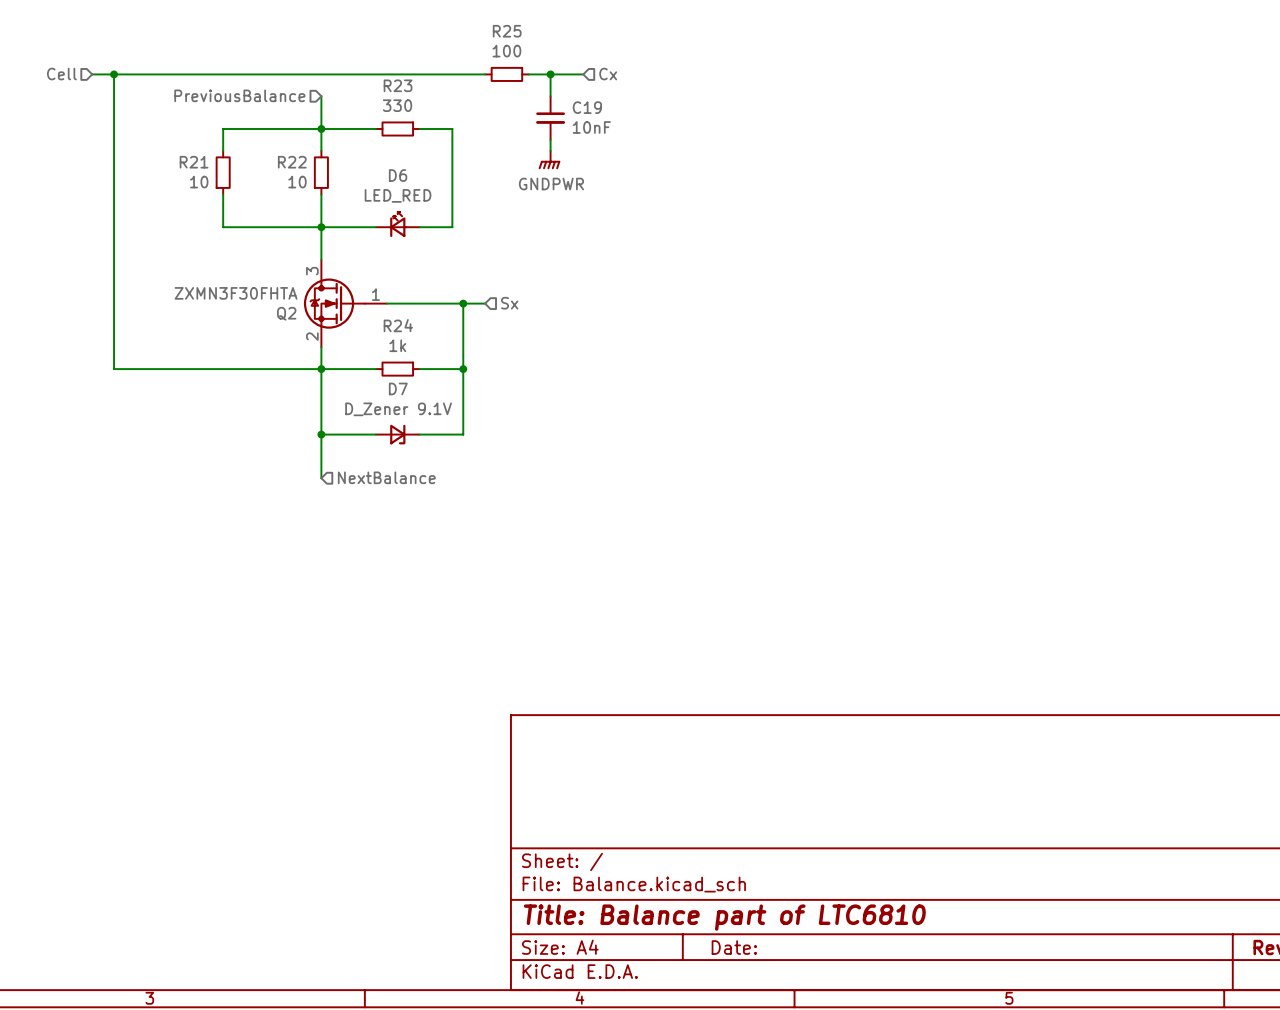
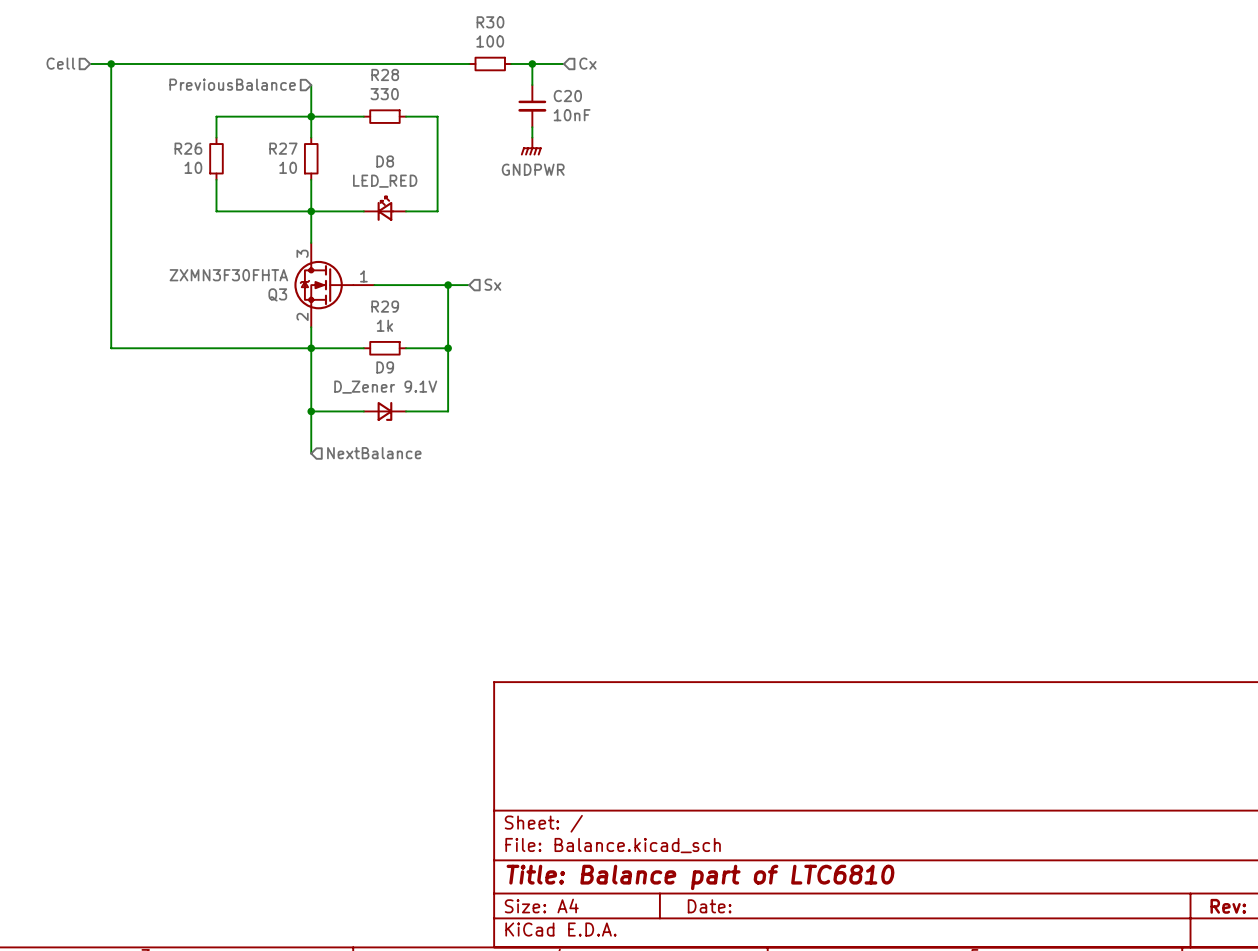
R25 name: R25 (507, 31) -> R30 (490, 22)
R23 name: R23 (398, 85) -> R28 (385, 74)
C19 name: C19 (587, 107) -> C20 (567, 96)
R21 name: R21 (194, 162) -> R26 (188, 148)
R22 name: R22 (292, 162) -> R27 (283, 148)
D6 name: D6 (398, 175) -> D8 (385, 161)
Q2 name: Q2 (286, 313) -> Q3 (277, 294)
R24 name: R24 (398, 325) -> R29 (385, 306)
D7 name: D7 (398, 388) -> D9 (385, 367)

